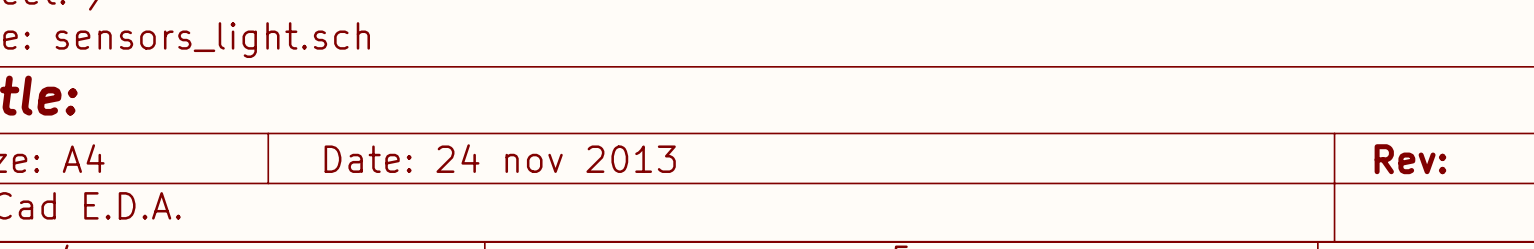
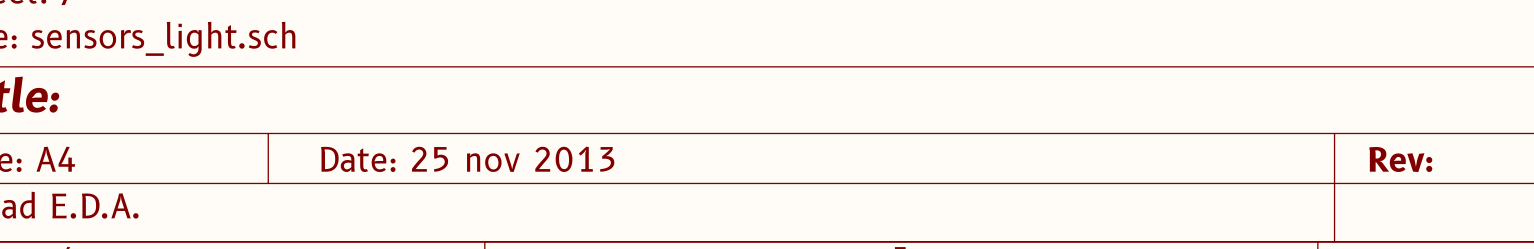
title block: Date: 24 nov 2013 (500, 158) -> Date: 25 nov 2013 (467, 159)

